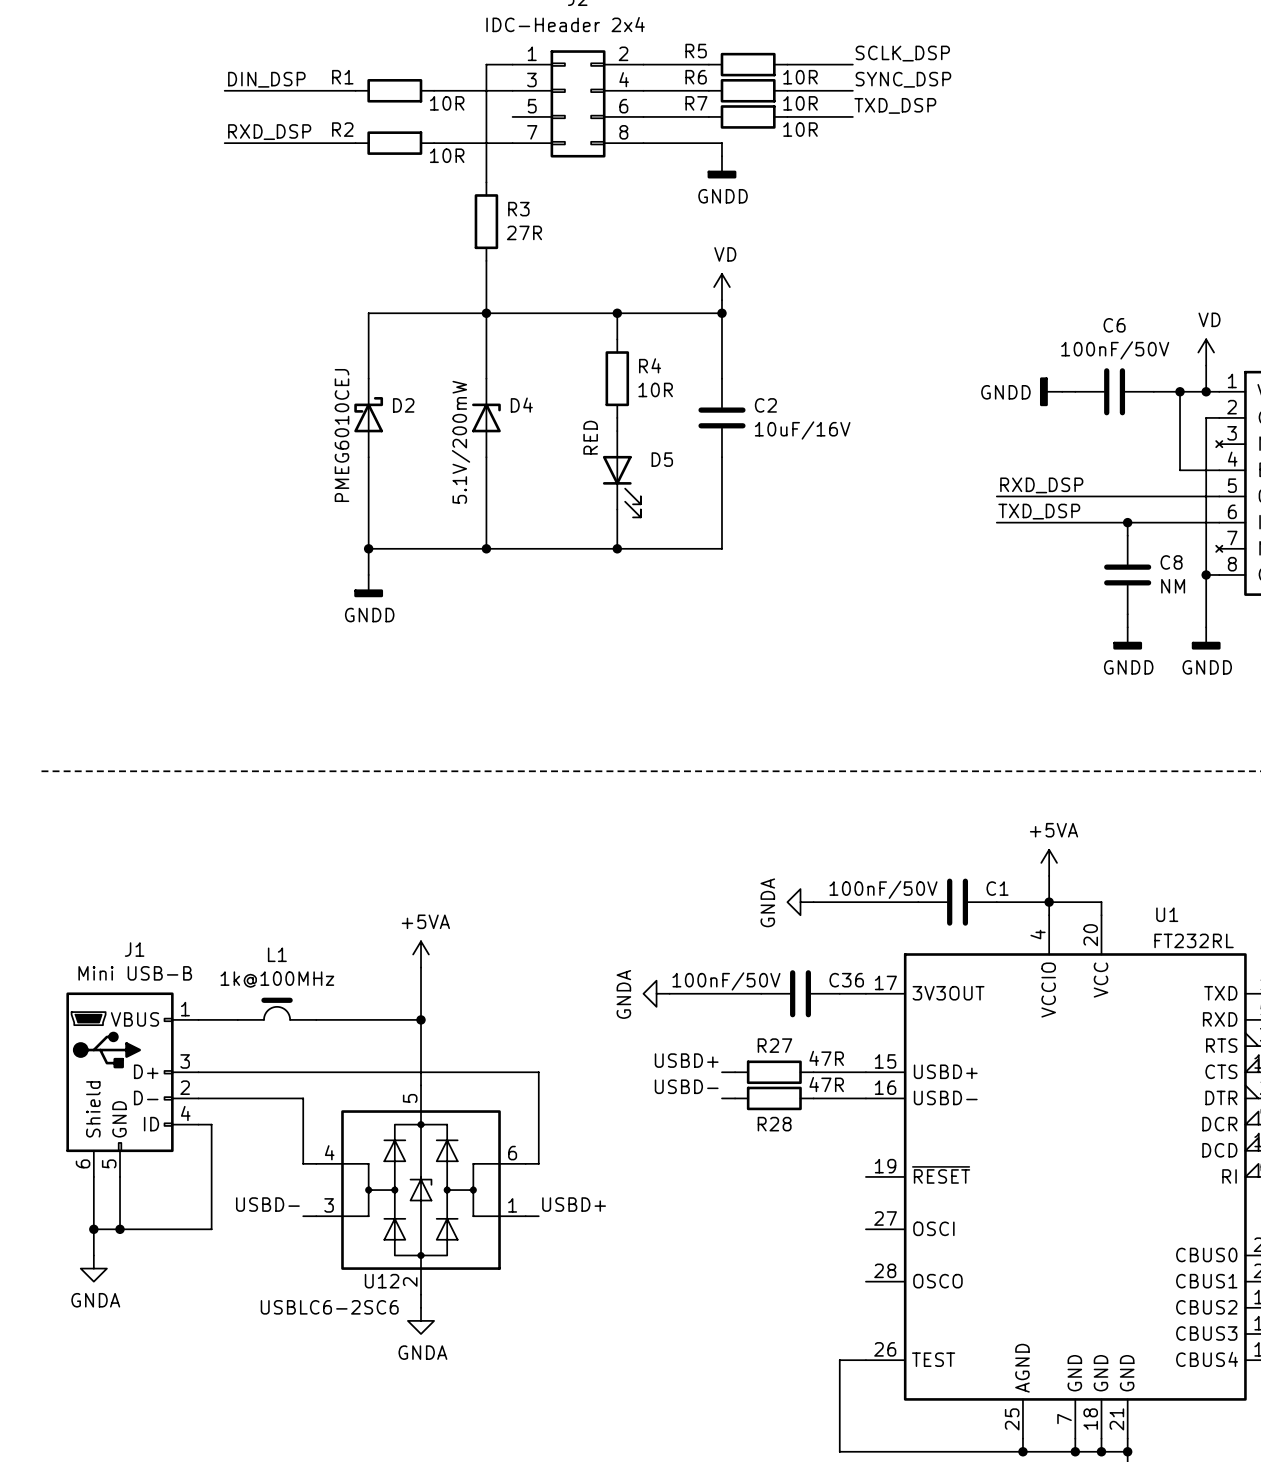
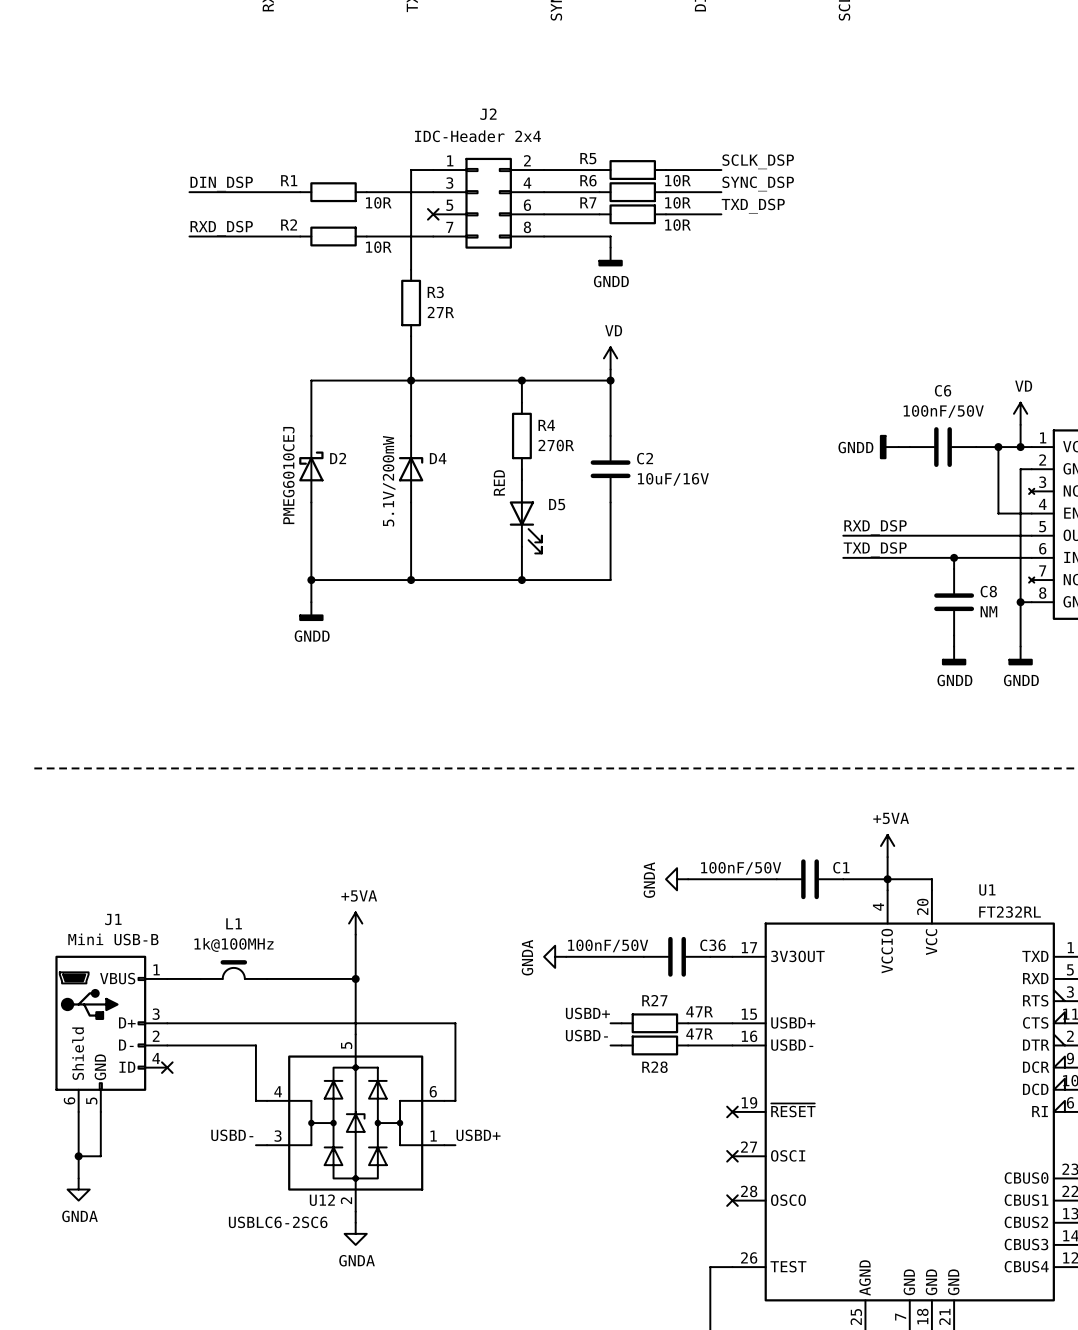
no-connect mark: none -> (433, 214)
R4 value: 10R (655, 389) -> 270R (556, 445)
wire: (198, 1124) (211, 1124) (211, 1229) (120, 1229) -> none
no-connect mark: none -> (167, 1067)
no-connect mark: none -> (732, 1111)
junction: (120, 1229) -> none
no-connect mark: none -> (732, 1156)
no-connect mark: none -> (732, 1200)

